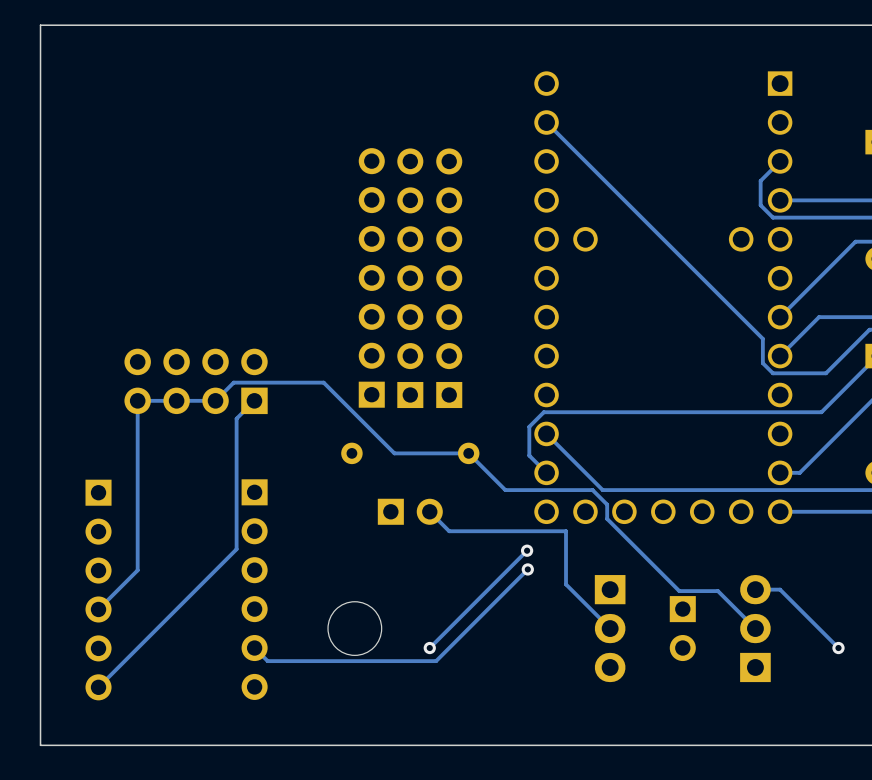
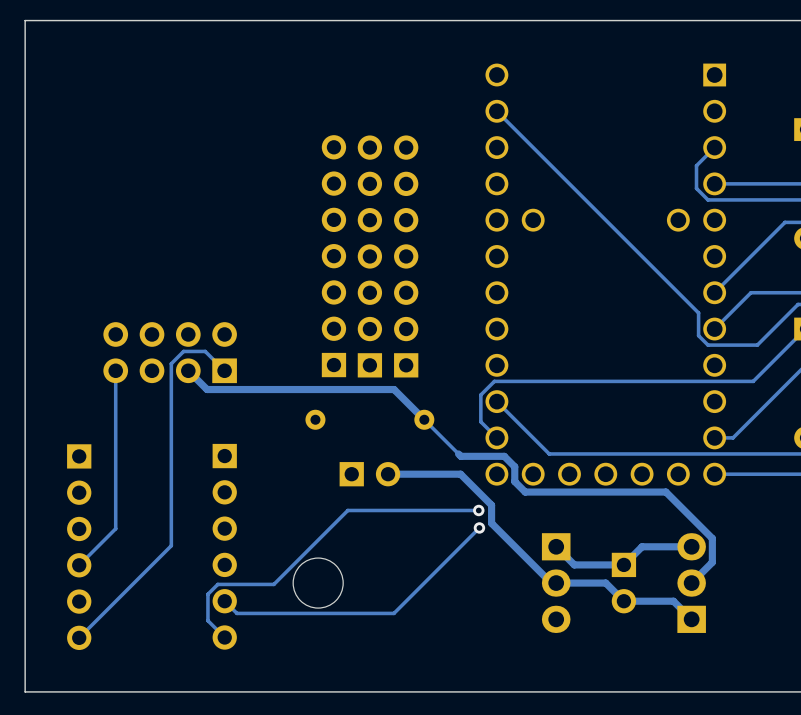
track: (137, 400) (215, 400) (233, 382) (323, 382) (394, 453) (468, 453) -> (188, 370) (207, 389) (394, 389) (424, 419)
track: (254, 400) (236, 418) (236, 549) (197, 588) -> (224, 370) (205, 351) (183, 351) (171, 363) (171, 545)
track: (505, 490) (592, 490) (607, 504) (607, 518) (679, 591) (717, 591) (755, 628) -> (458, 453) (460, 456) (504, 456) (514, 466) (514, 481) (525, 492) (665, 492) (712, 538) (712, 562) (691, 583)
track: (429, 511) (449, 531) (566, 531) (566, 584) (610, 628) -> (388, 474) (460, 474) (491, 505) (491, 523) (551, 583) (605, 583) (623, 601) (673, 601) (691, 619)
track: (527, 550) (429, 648) -> (478, 510) (347, 510) (273, 584) (217, 584) (207, 594) (207, 620) (224, 637)
track: (755, 589) (780, 589) (838, 648) -> (691, 546) (642, 546) (623, 564) (574, 564) (556, 546)
via: (429, 648) -> none
via: (838, 648) -> none

